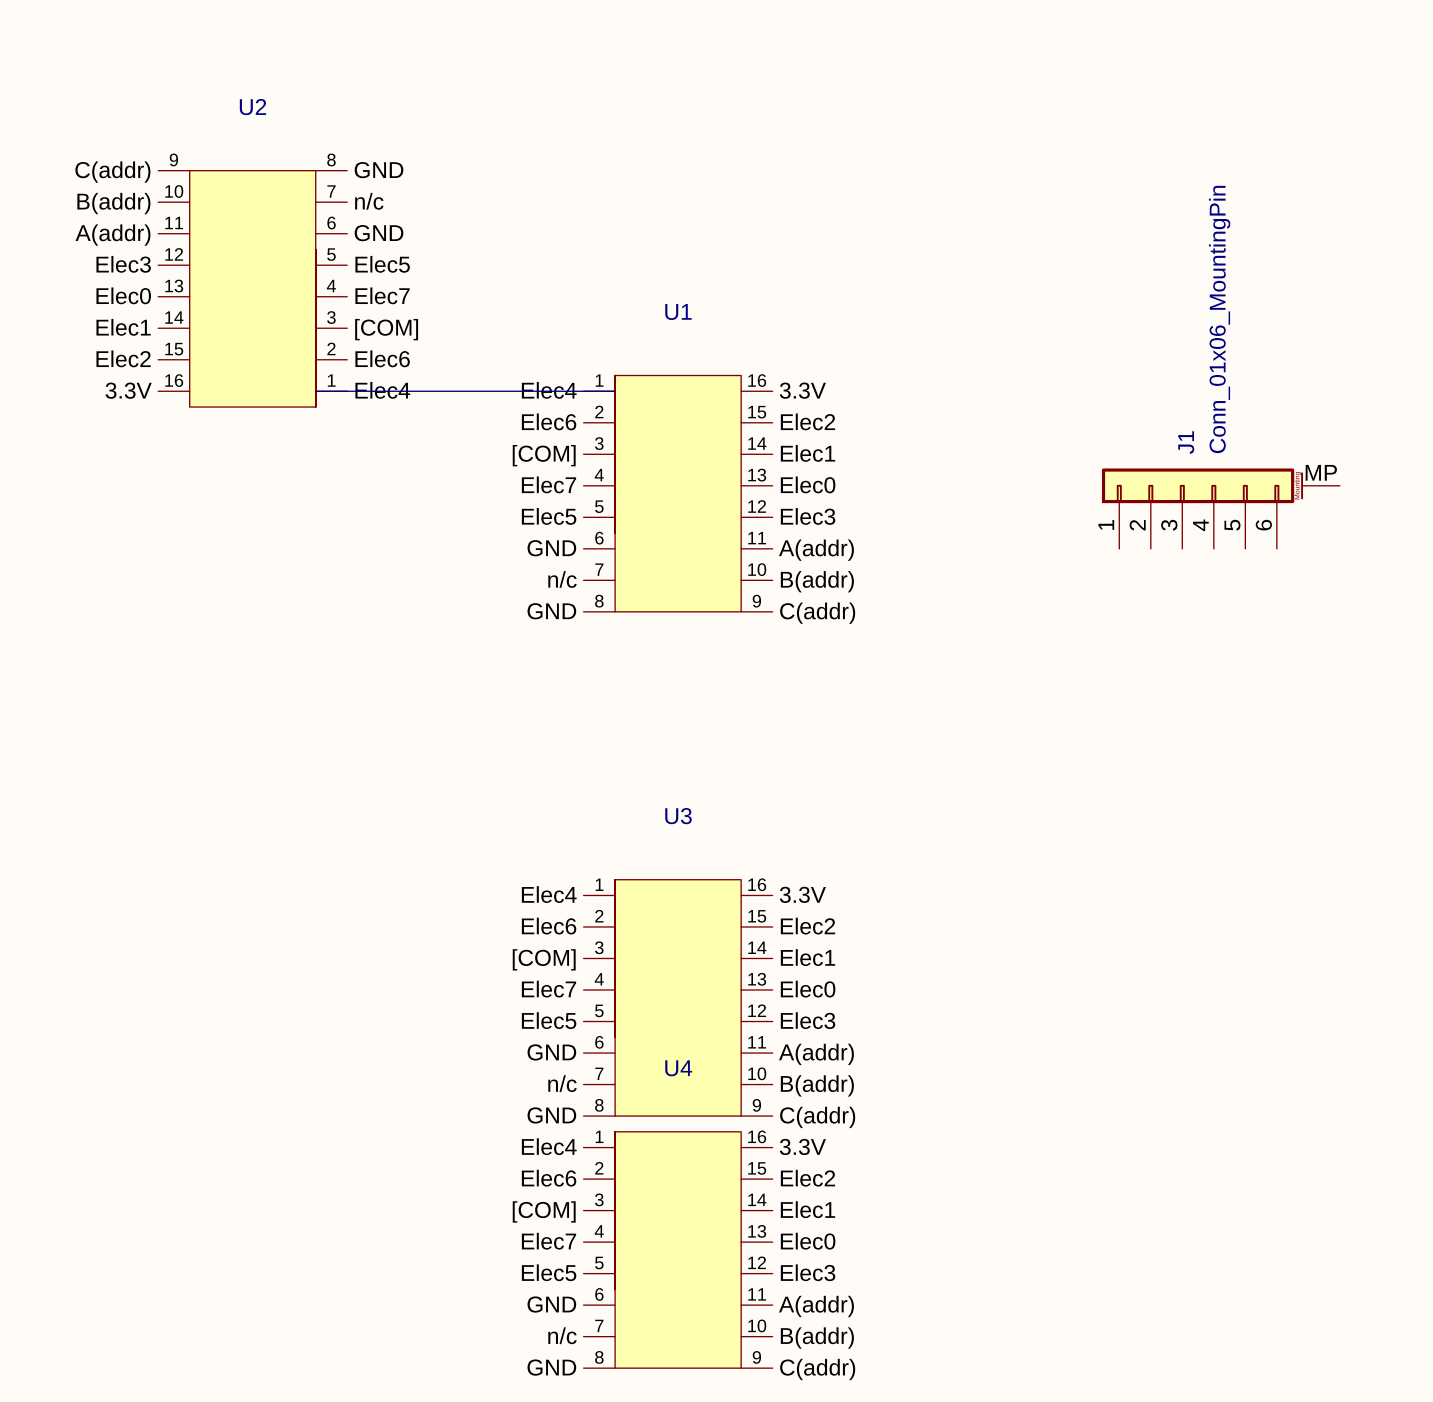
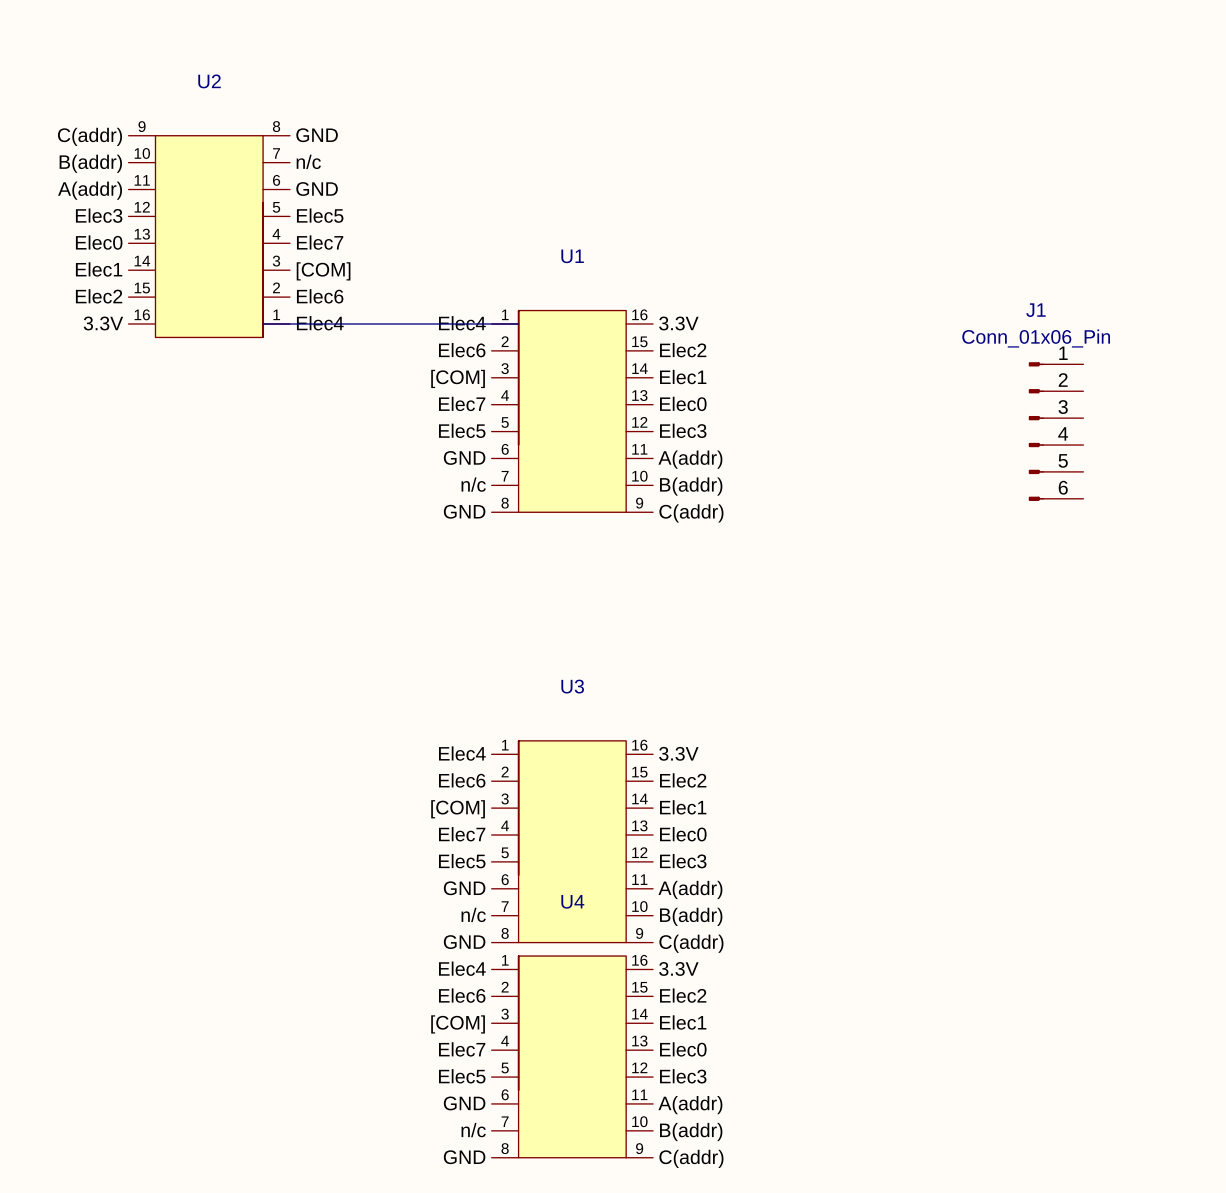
J1 value: Conn_01x06_MountingPin (1219, 319) -> Conn_01x06_Pin (1036, 338)
J1 name position: J1 (1186, 442) -> J1 (1035, 310)
J1 symbol: [1101, 468, 1340, 549] -> [1028, 362, 1084, 501]

